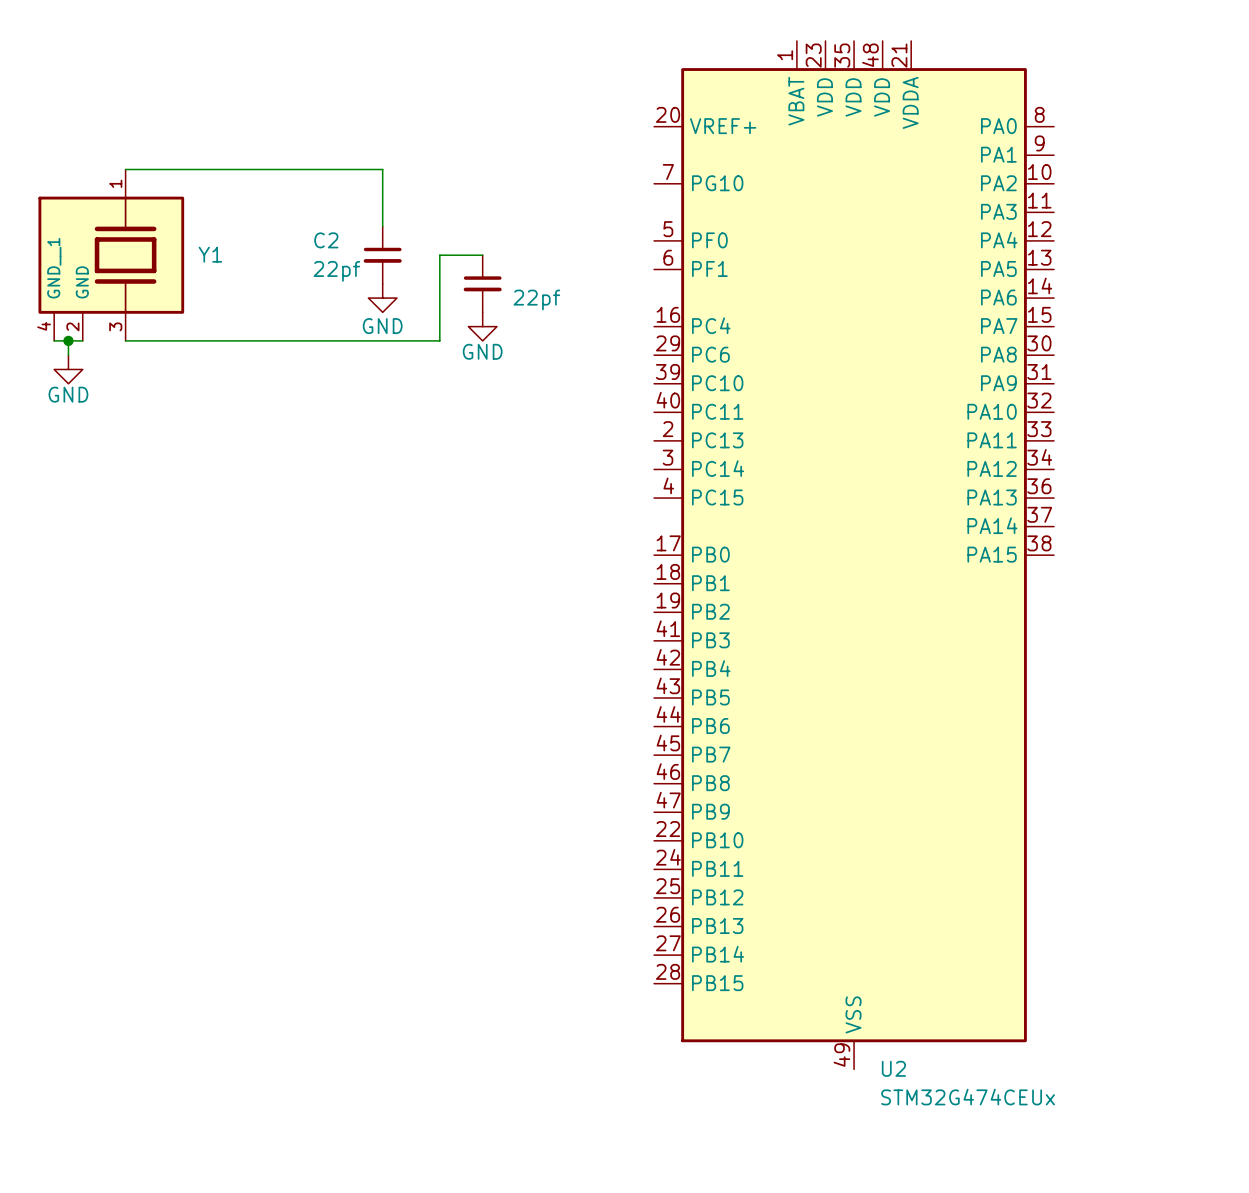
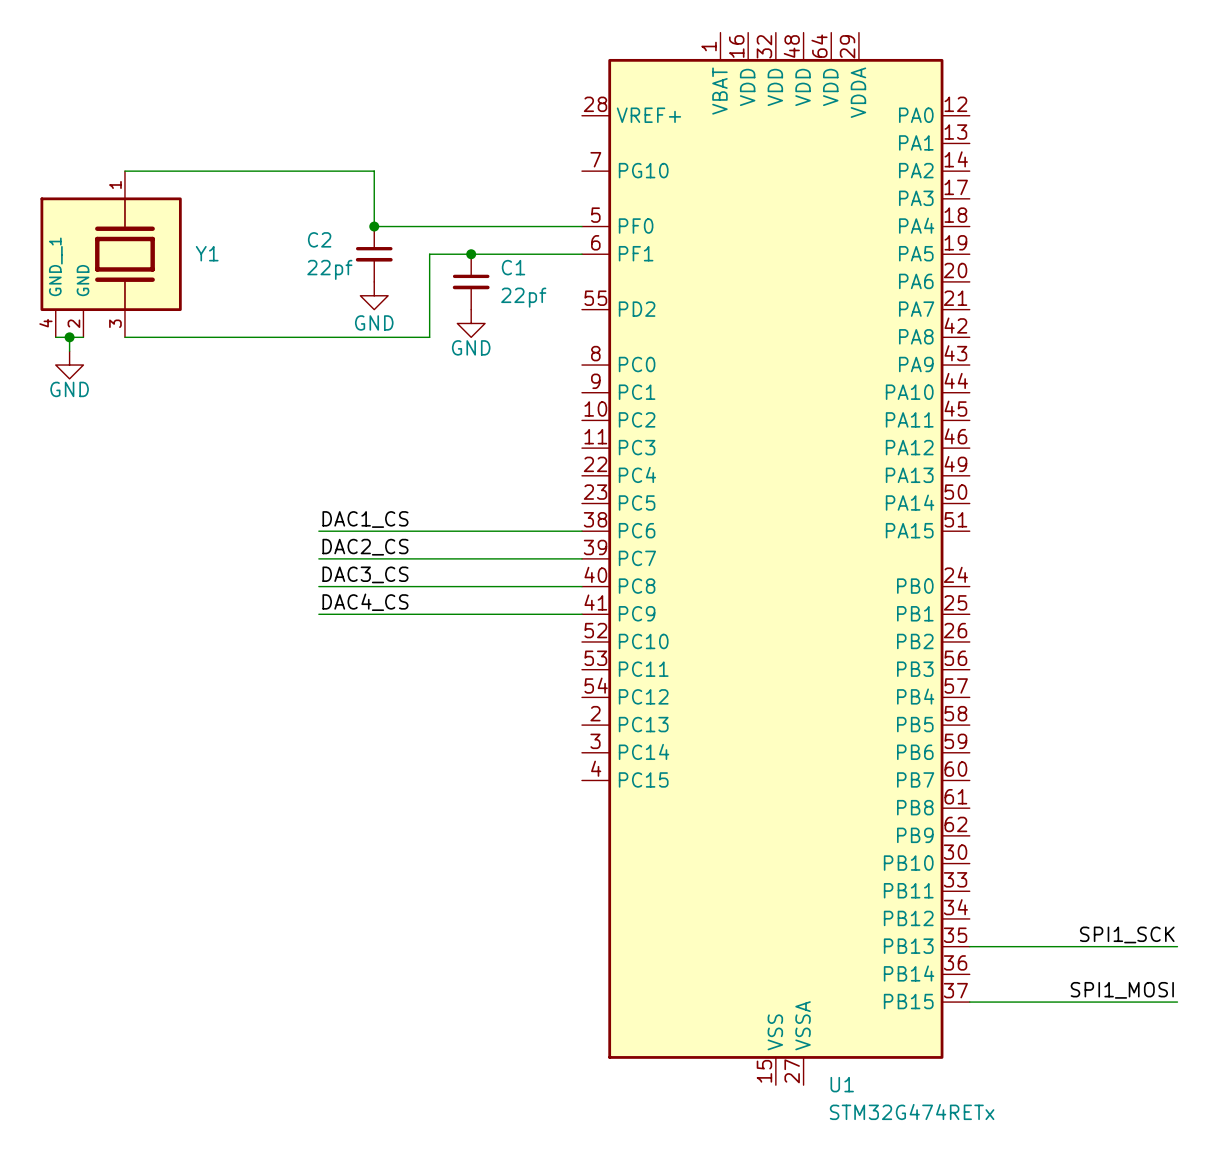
wire: none -> (374, 226) (581, 226)
junction: none -> (374, 226)
wire: none -> (471, 254) (581, 254)
junction: none -> (471, 254)
C1 name: none -> C1 (513, 267)
label: none -> DAC1_CS (365, 519)
wire: none -> (318, 531) (581, 531)
U2: STM32G474CEUx (854, 555) -> none
label: none -> DAC2_CS (365, 547)
wire: none -> (318, 558) (581, 558)
U1: none -> STM32G474RETx (775, 558)
label: none -> DAC3_CS (365, 574)
wire: none -> (318, 586) (581, 586)
label: none -> DAC4_CS (365, 602)
wire: none -> (318, 614) (581, 614)
label: none -> SPI1_SCK (1127, 934)
wire: none -> (969, 946) (1177, 946)
label: none -> SPI1_MOSI (1122, 990)
wire: none -> (969, 1002) (1177, 1002)

